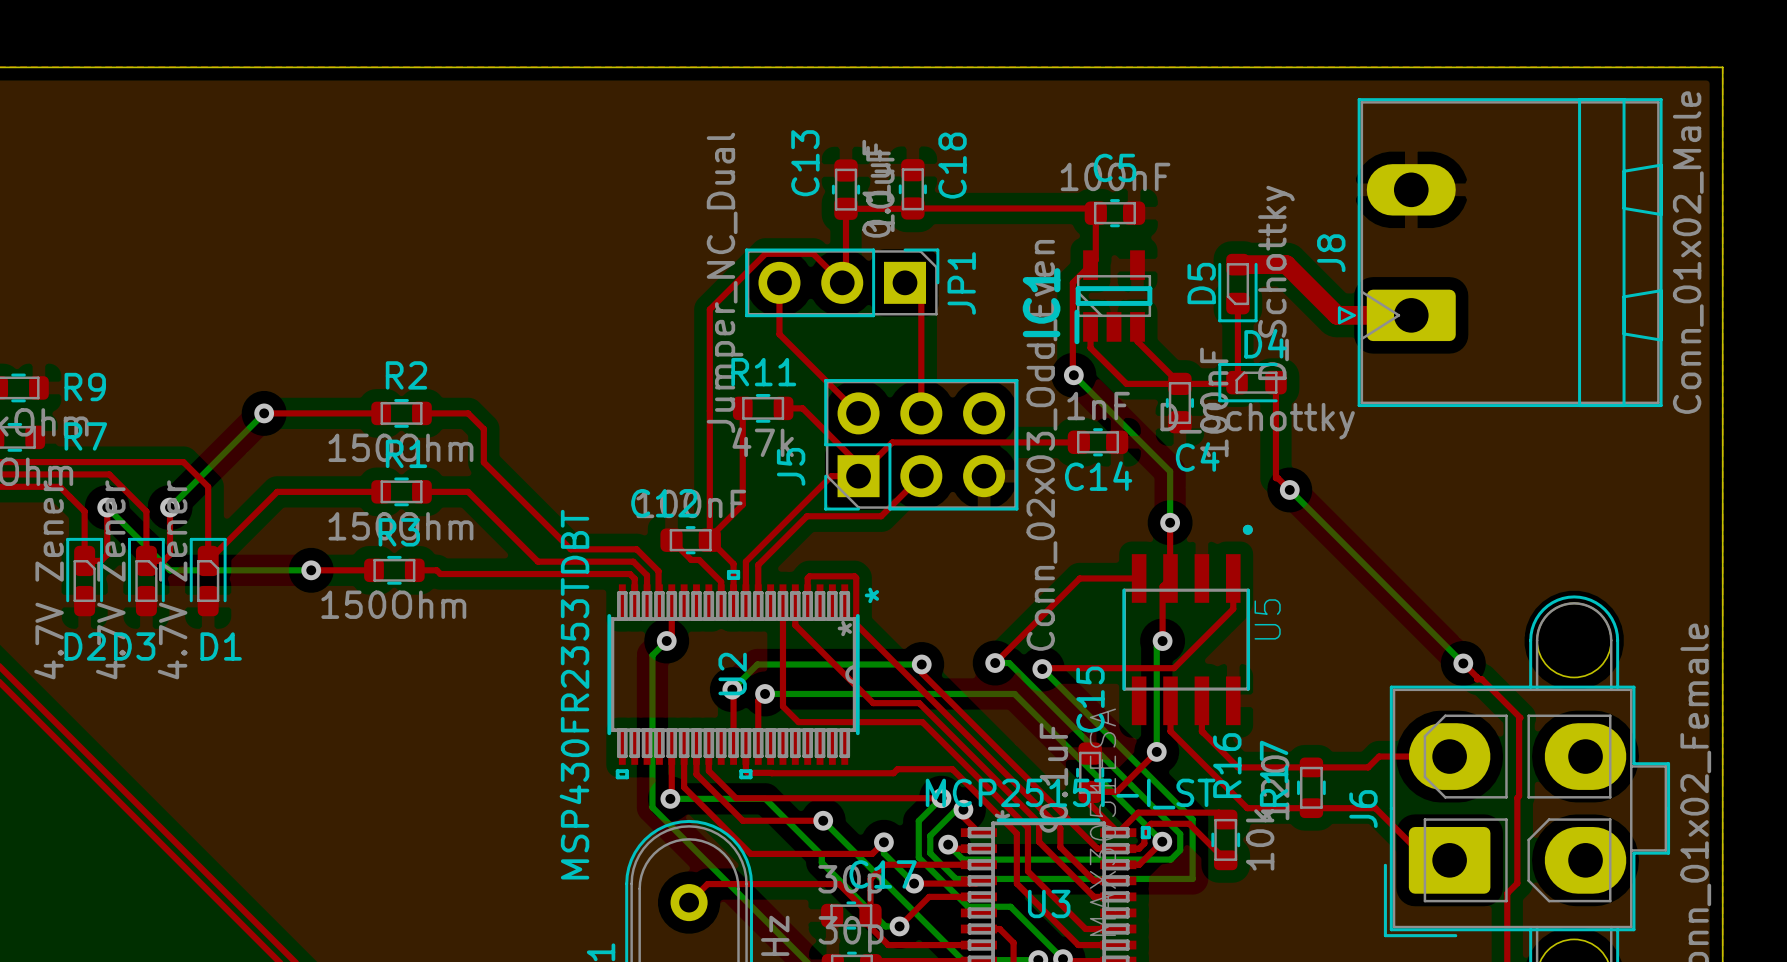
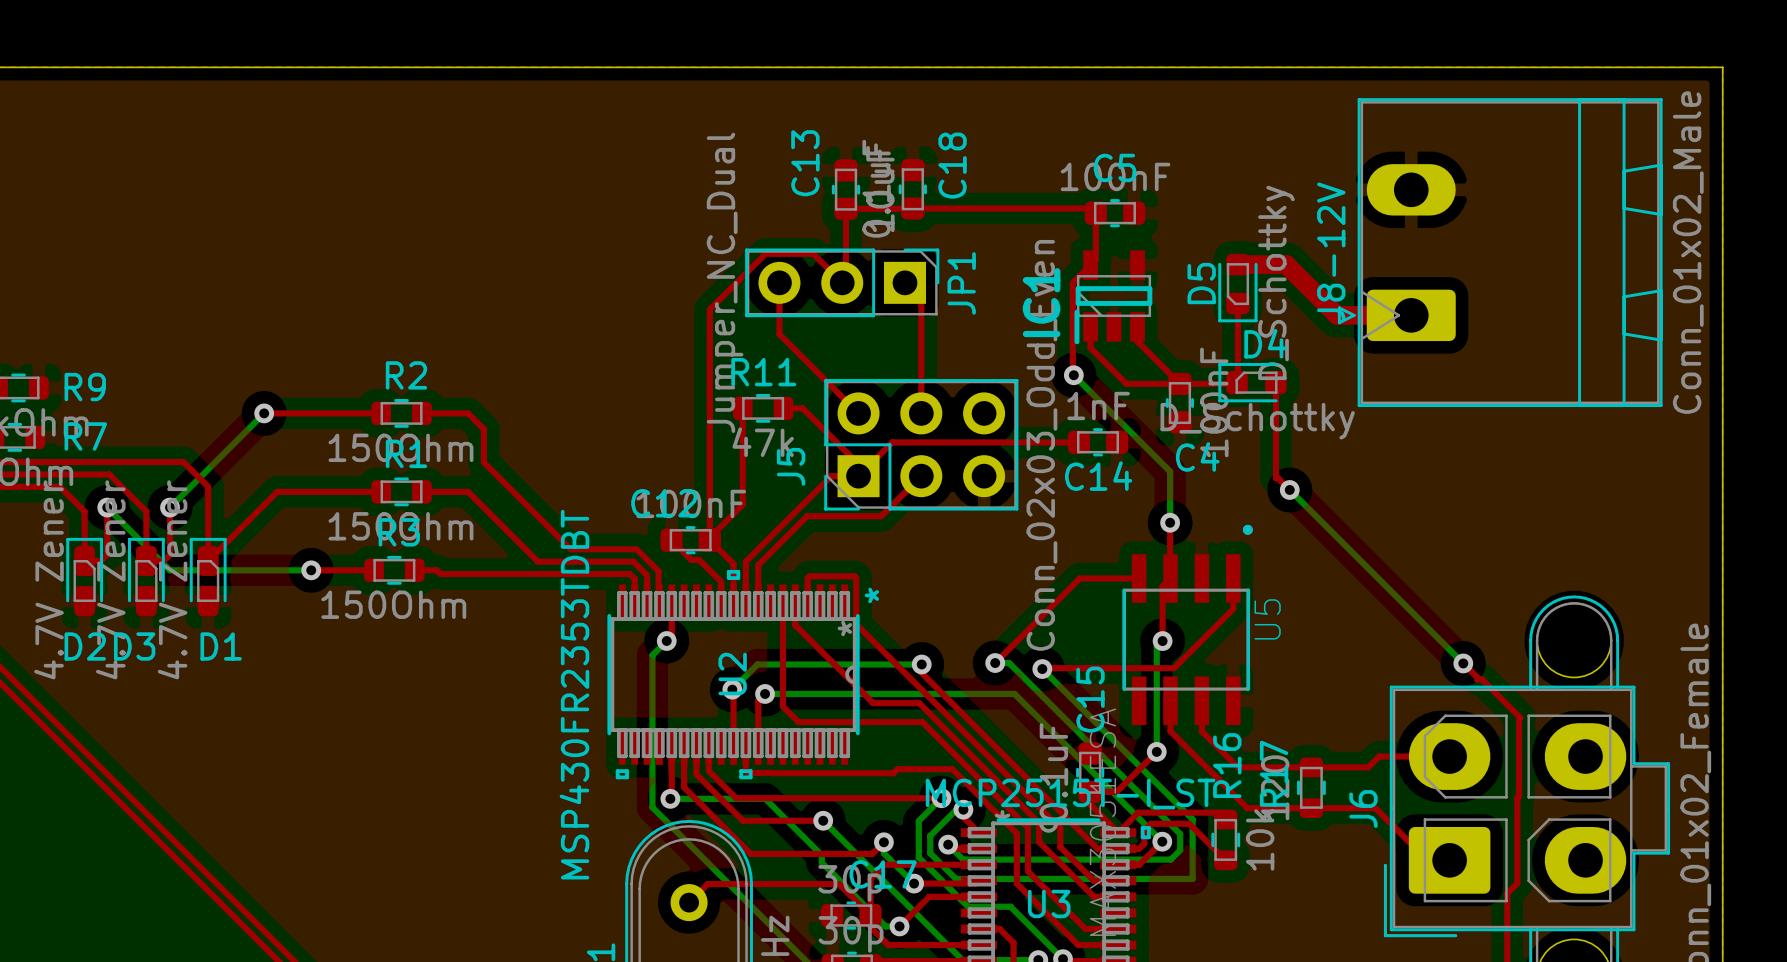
J8 name: J8 (1331, 253) -> J8-12V (1331, 252)

